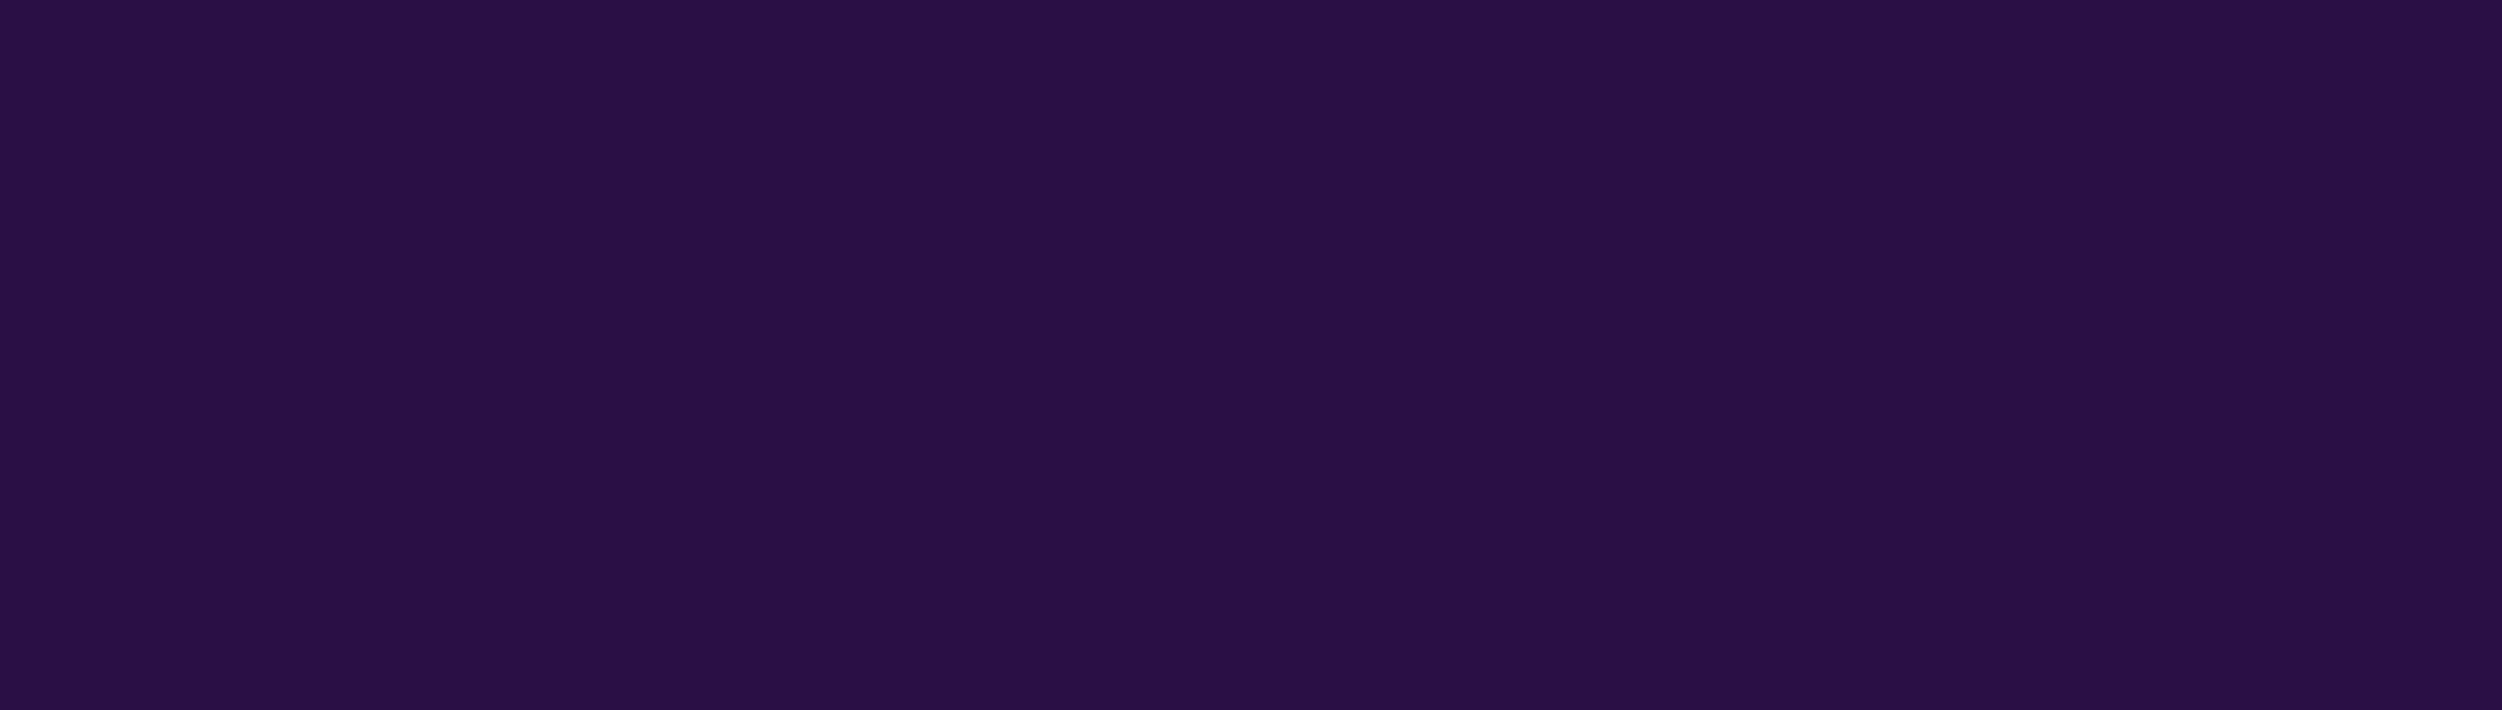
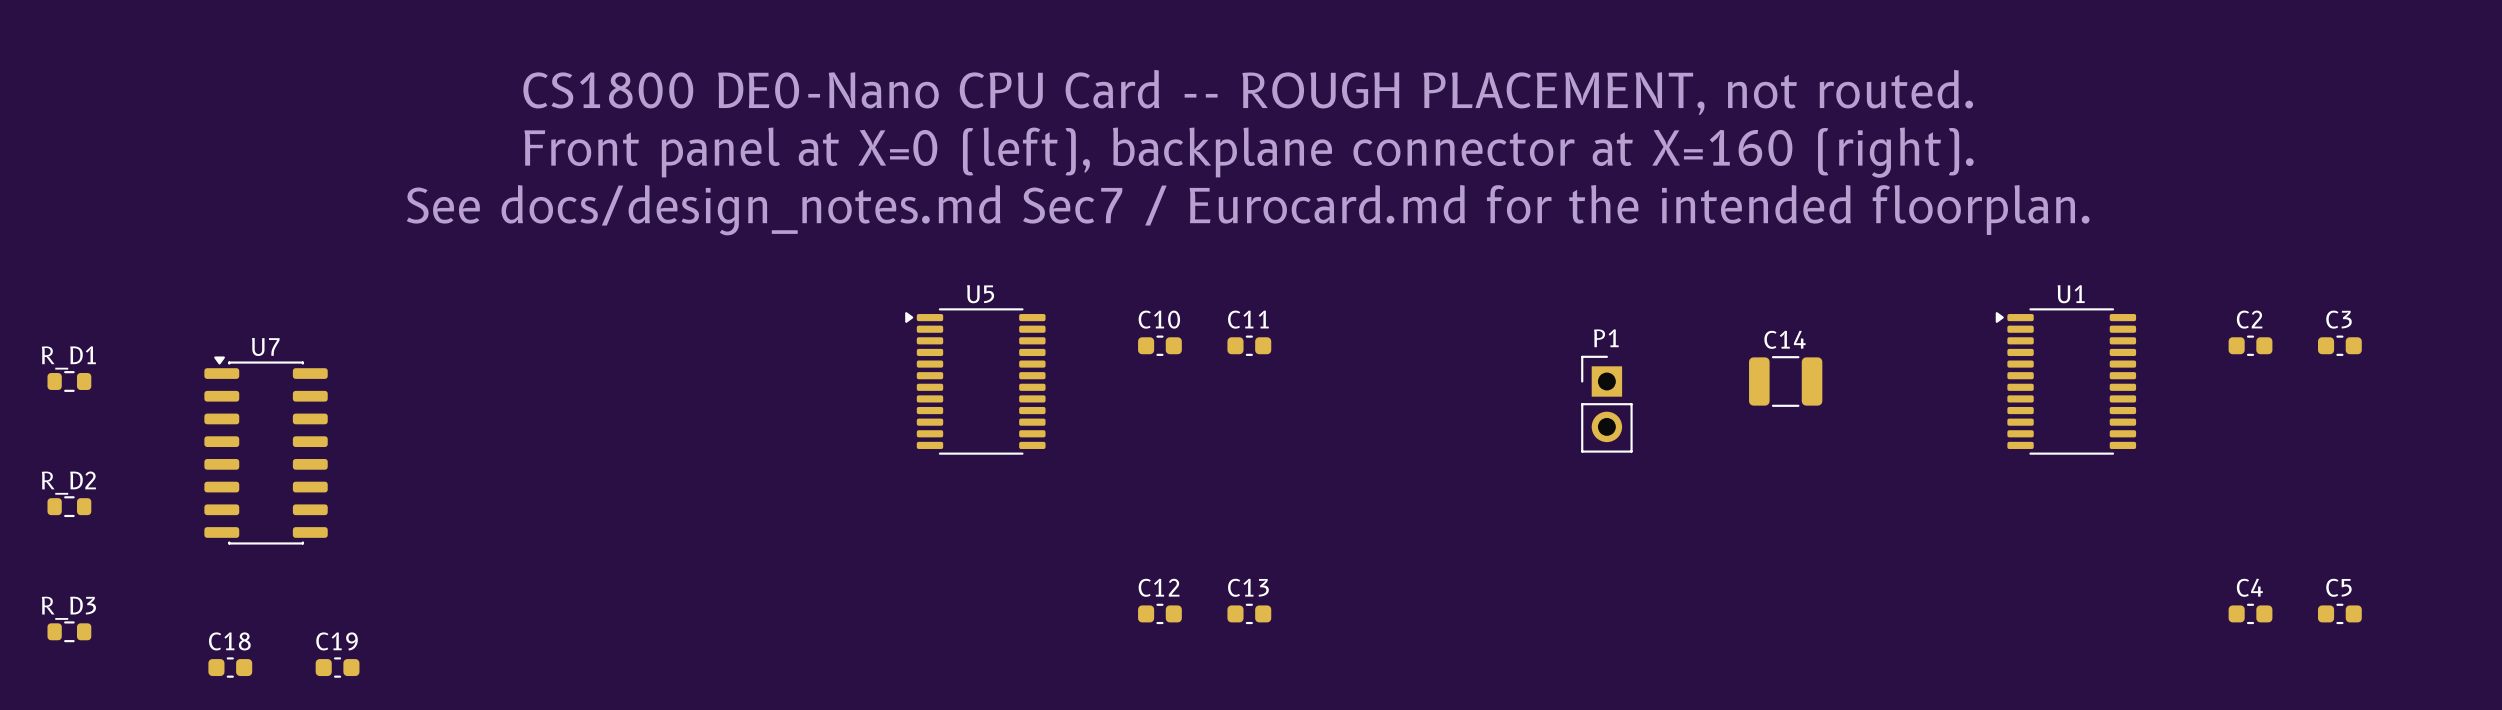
text: none -> CS1800 DE0-Nano CPU Card -- ROUGH PLACEMENT, not routed. (1248, 92)
text: none -> Front panel at X=0 (left), backplane connector at X=160 (right). (1249, 152)
text: none -> See docs/design_notes.md Sec7 / Eurocard.md for the intended floorplan. (1248, 210)
C10: none -> (1159, 345)
C11: none -> (1249, 345)
C2: none -> (2250, 345)
C3: none -> (2339, 345)
R_D1: none -> (69, 381)
U5: none -> (975, 381)
C14: none -> (1785, 381)
U1: none -> (2065, 381)
P1: none -> (1606, 404)
U7: none -> (266, 450)
R_D2: none -> (69, 506)
C12: none -> (1159, 613)
C13: none -> (1249, 613)
C4: none -> (2250, 613)
C5: none -> (2339, 613)
R_D3: none -> (69, 631)
C18: none -> (230, 667)
C19: none -> (337, 667)

